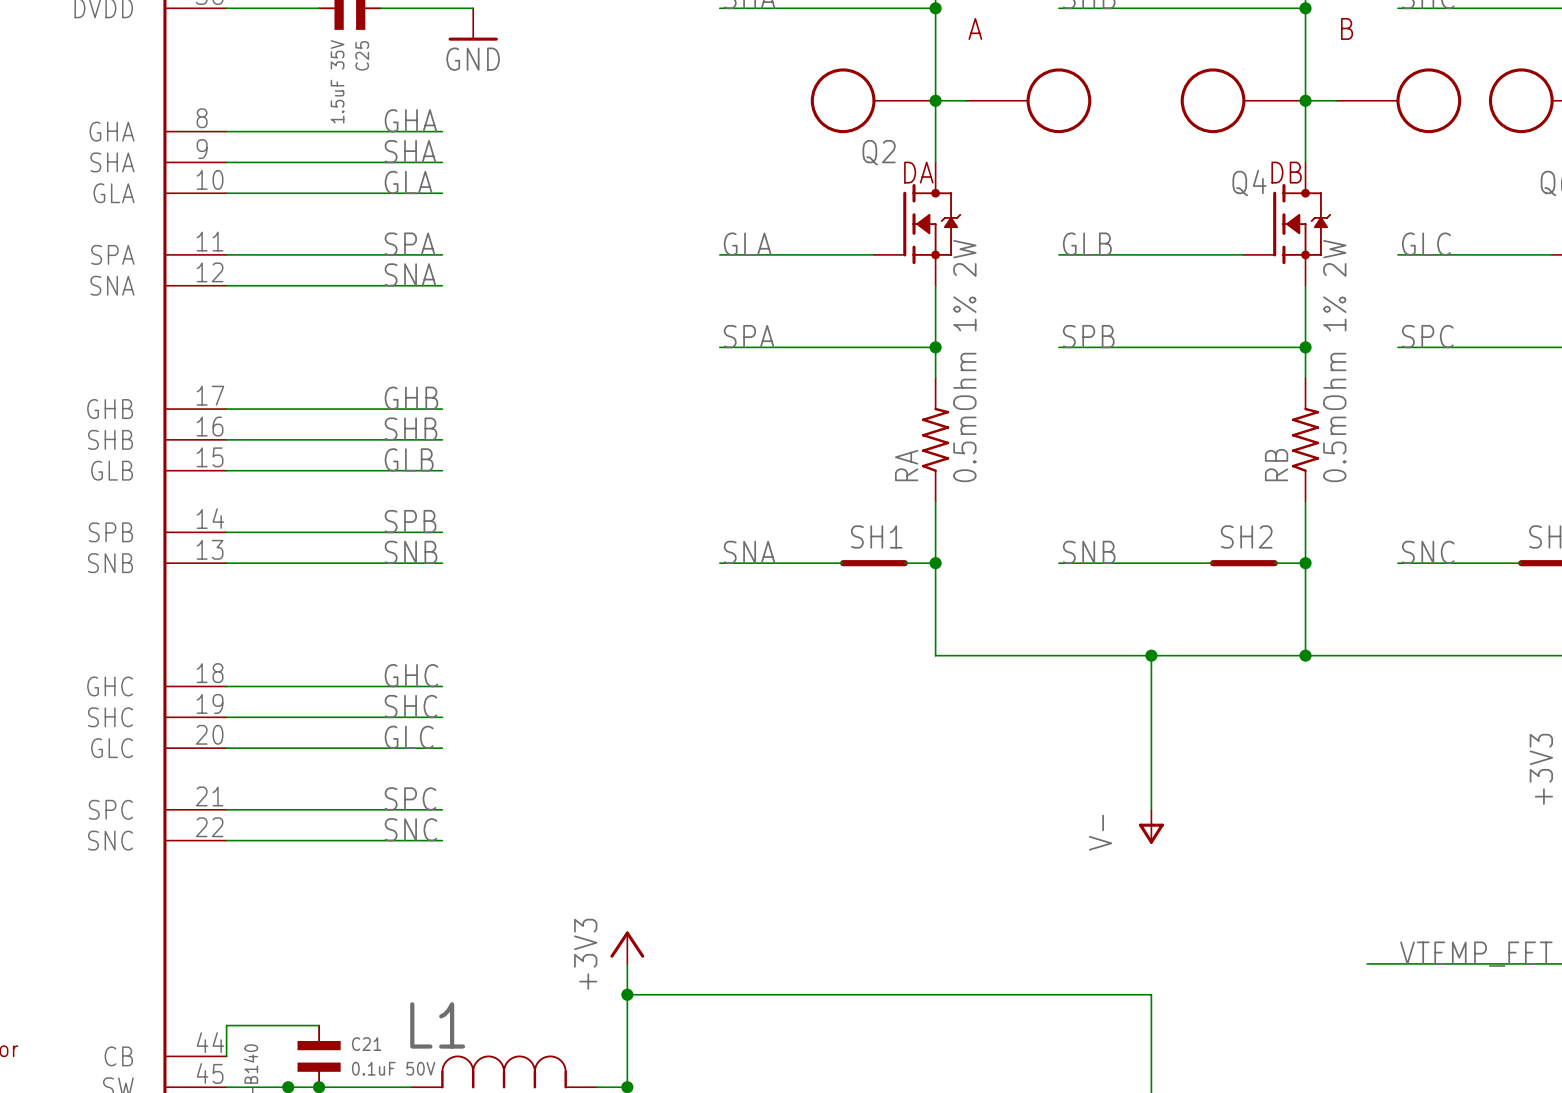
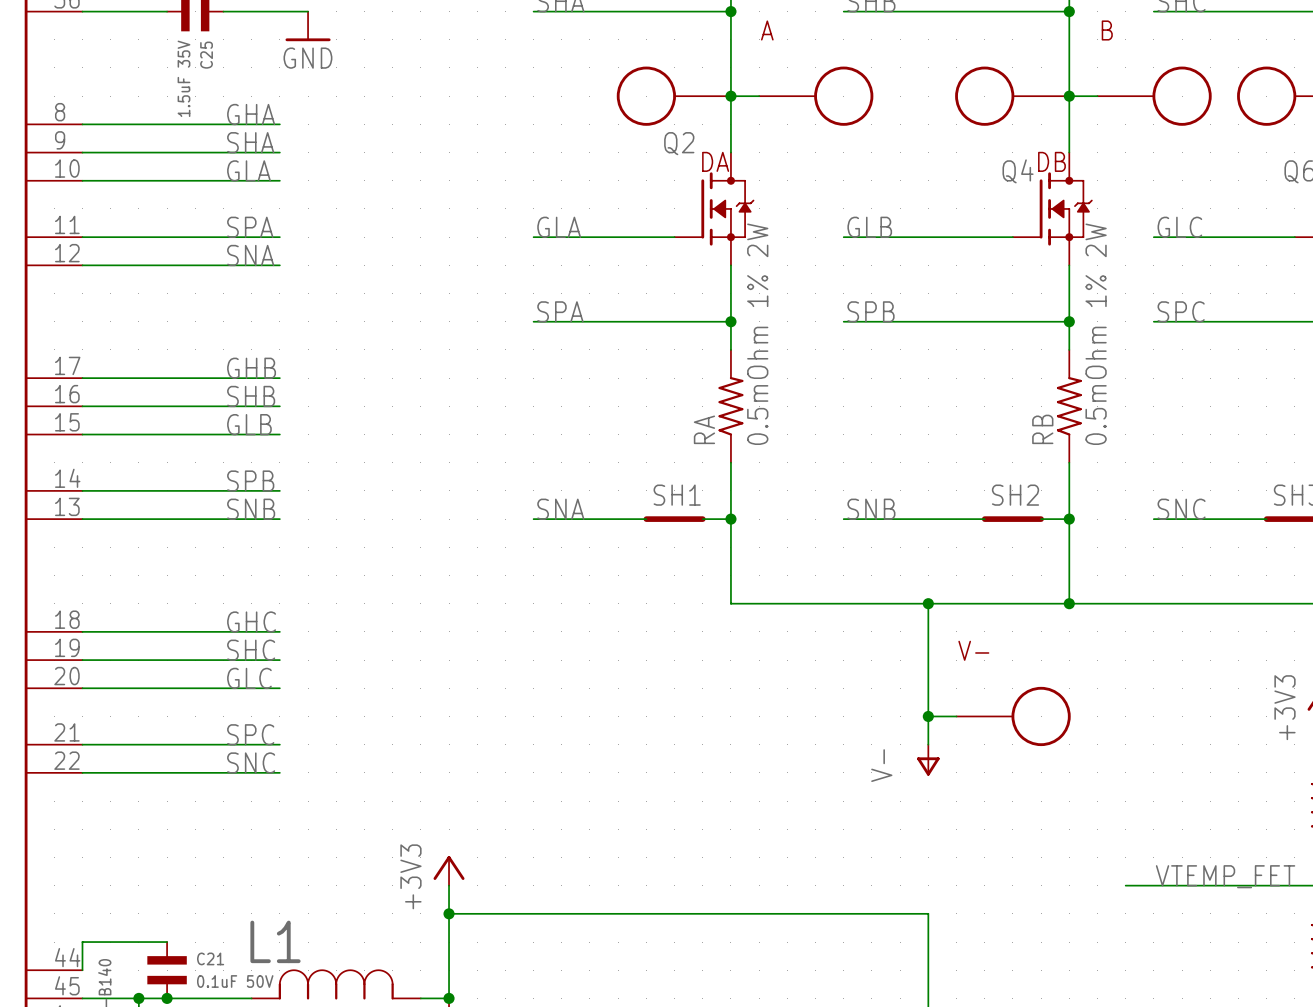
wire: none -> (928, 716) (956, 716)
junction: none -> (928, 716)
V-: none -> (1013, 716)

